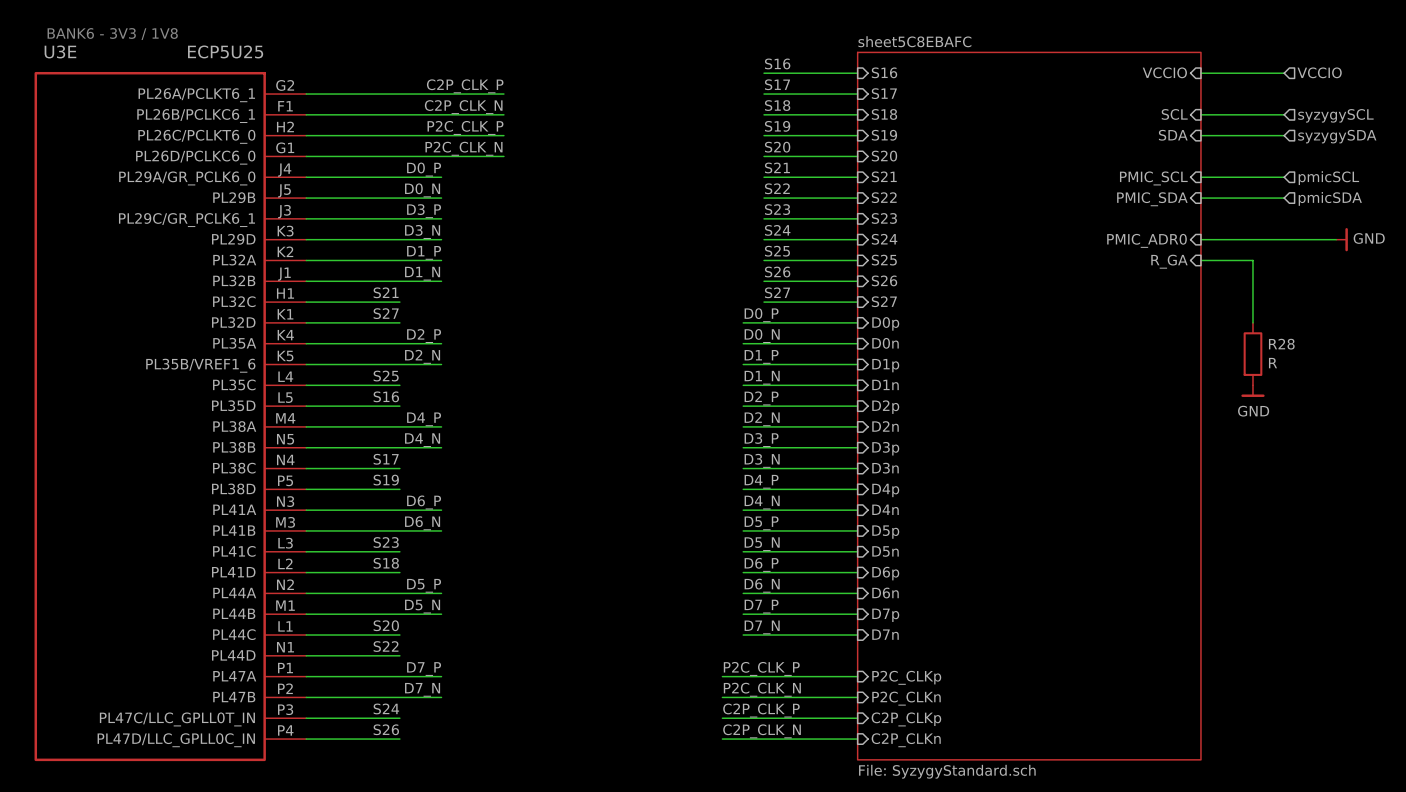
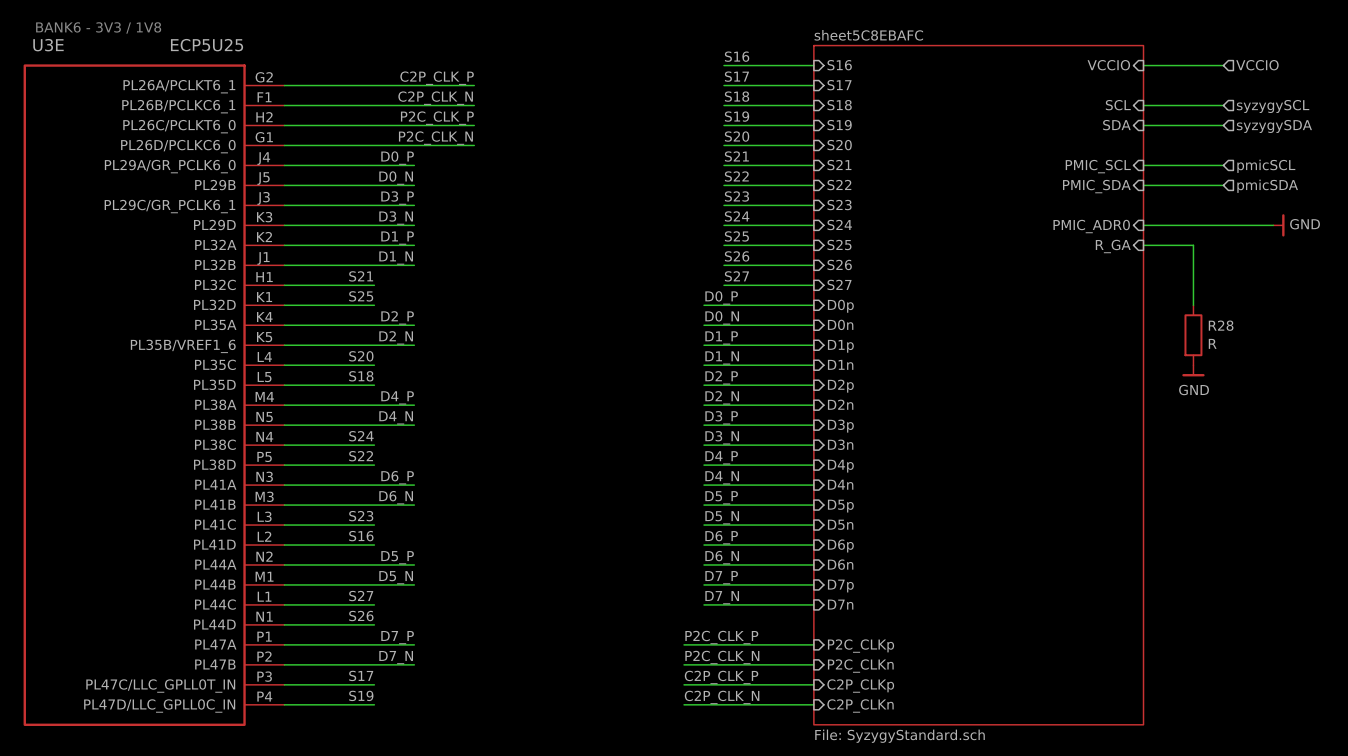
label: S27 (386, 313) -> S25 (361, 296)
label: S25 (386, 376) -> S20 (361, 356)
label: S16 (386, 396) -> S18 (361, 376)
label: S17 (386, 459) -> S24 (361, 436)
label: S19 (386, 480) -> S22 (361, 456)
label: S18 (386, 563) -> S16 (361, 536)
label: S20 (386, 625) -> S27 (361, 596)
label: S22 (386, 646) -> S26 (361, 616)
label: S24 (386, 708) -> S17 (361, 675)
label: S26 (386, 729) -> S19 (361, 695)

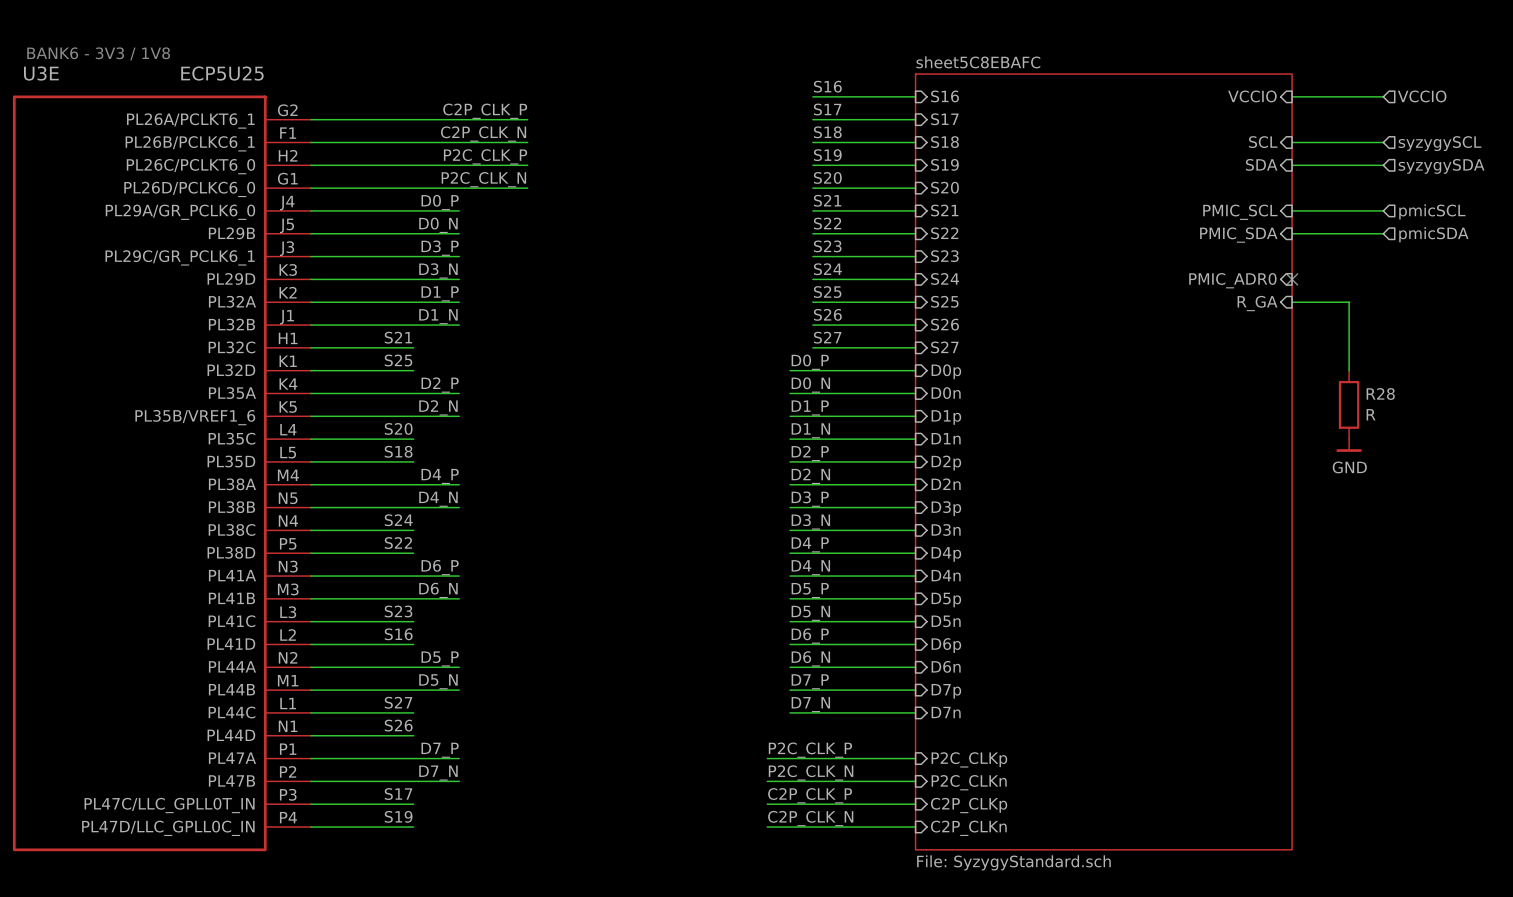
wire: (1143, 225) (1273, 225) -> none
no-connect mark: none -> (1292, 279)
power symbol: GND (1278, 225) -> none

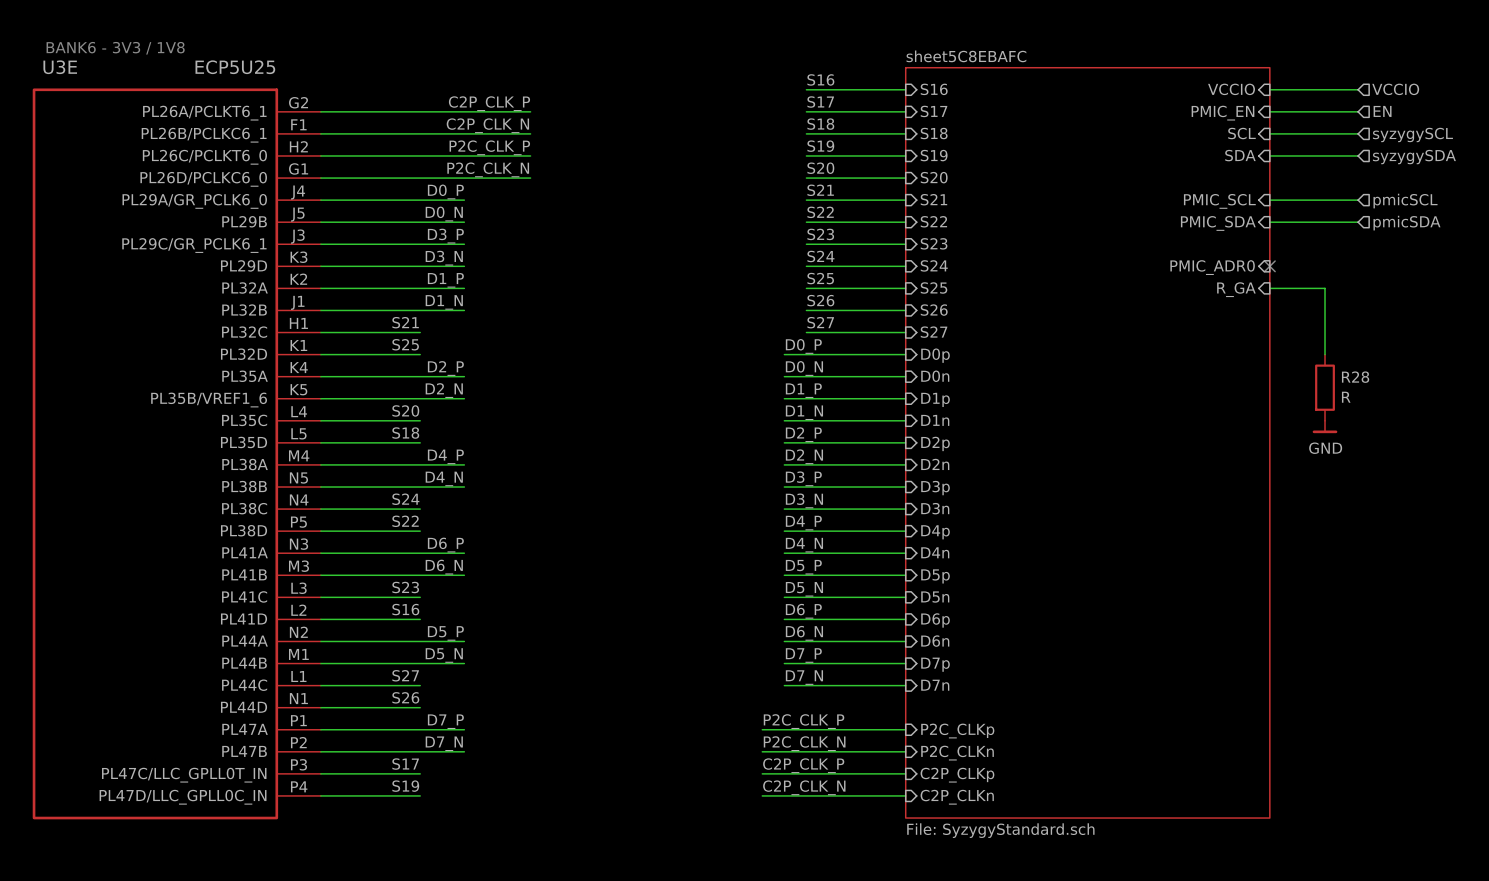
wire: none -> (1269, 111) (1358, 111)
hierarchical label: none -> EN (1382, 111)
sheet pin: none -> PMIC_EN (1222, 113)

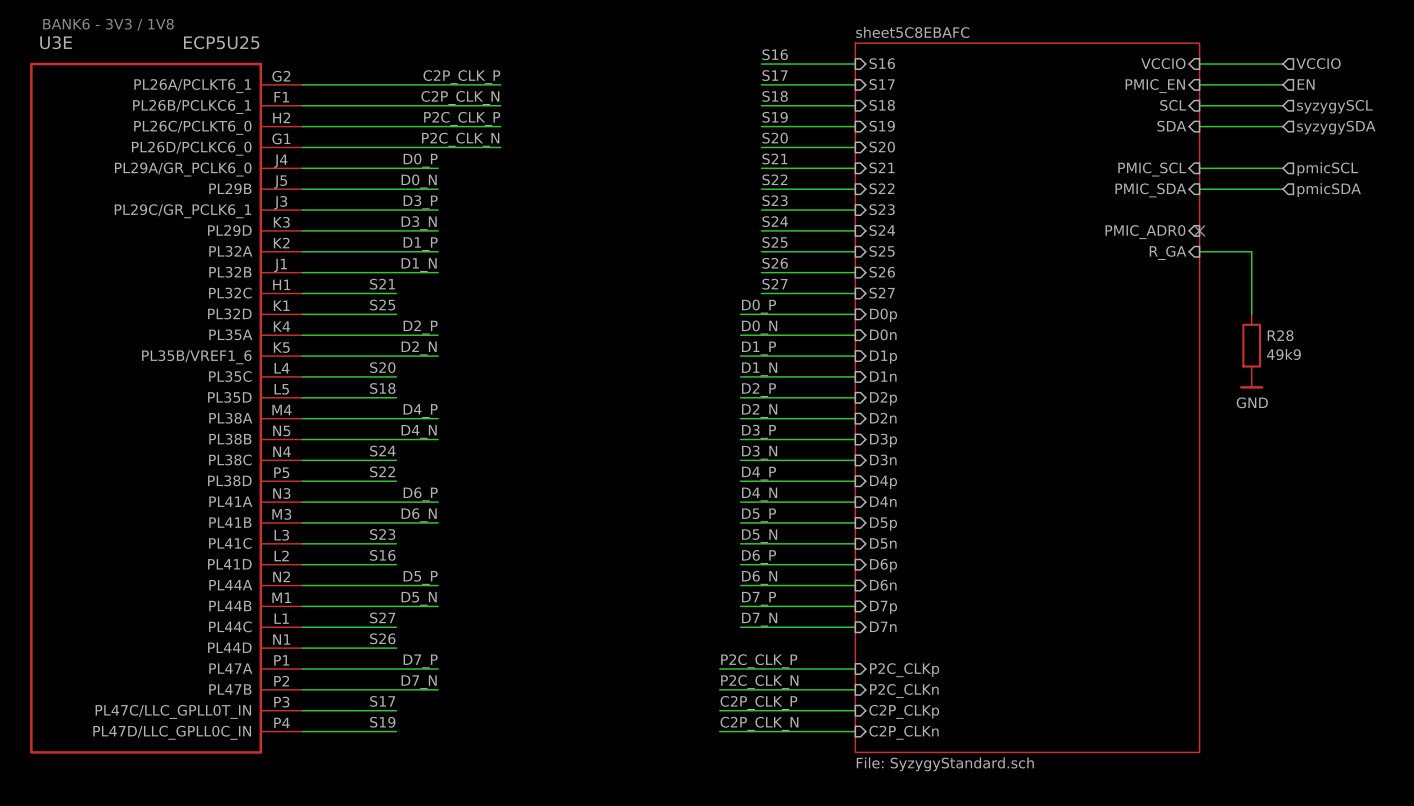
R28 value: R (1346, 397) -> 49k9 (1283, 354)

